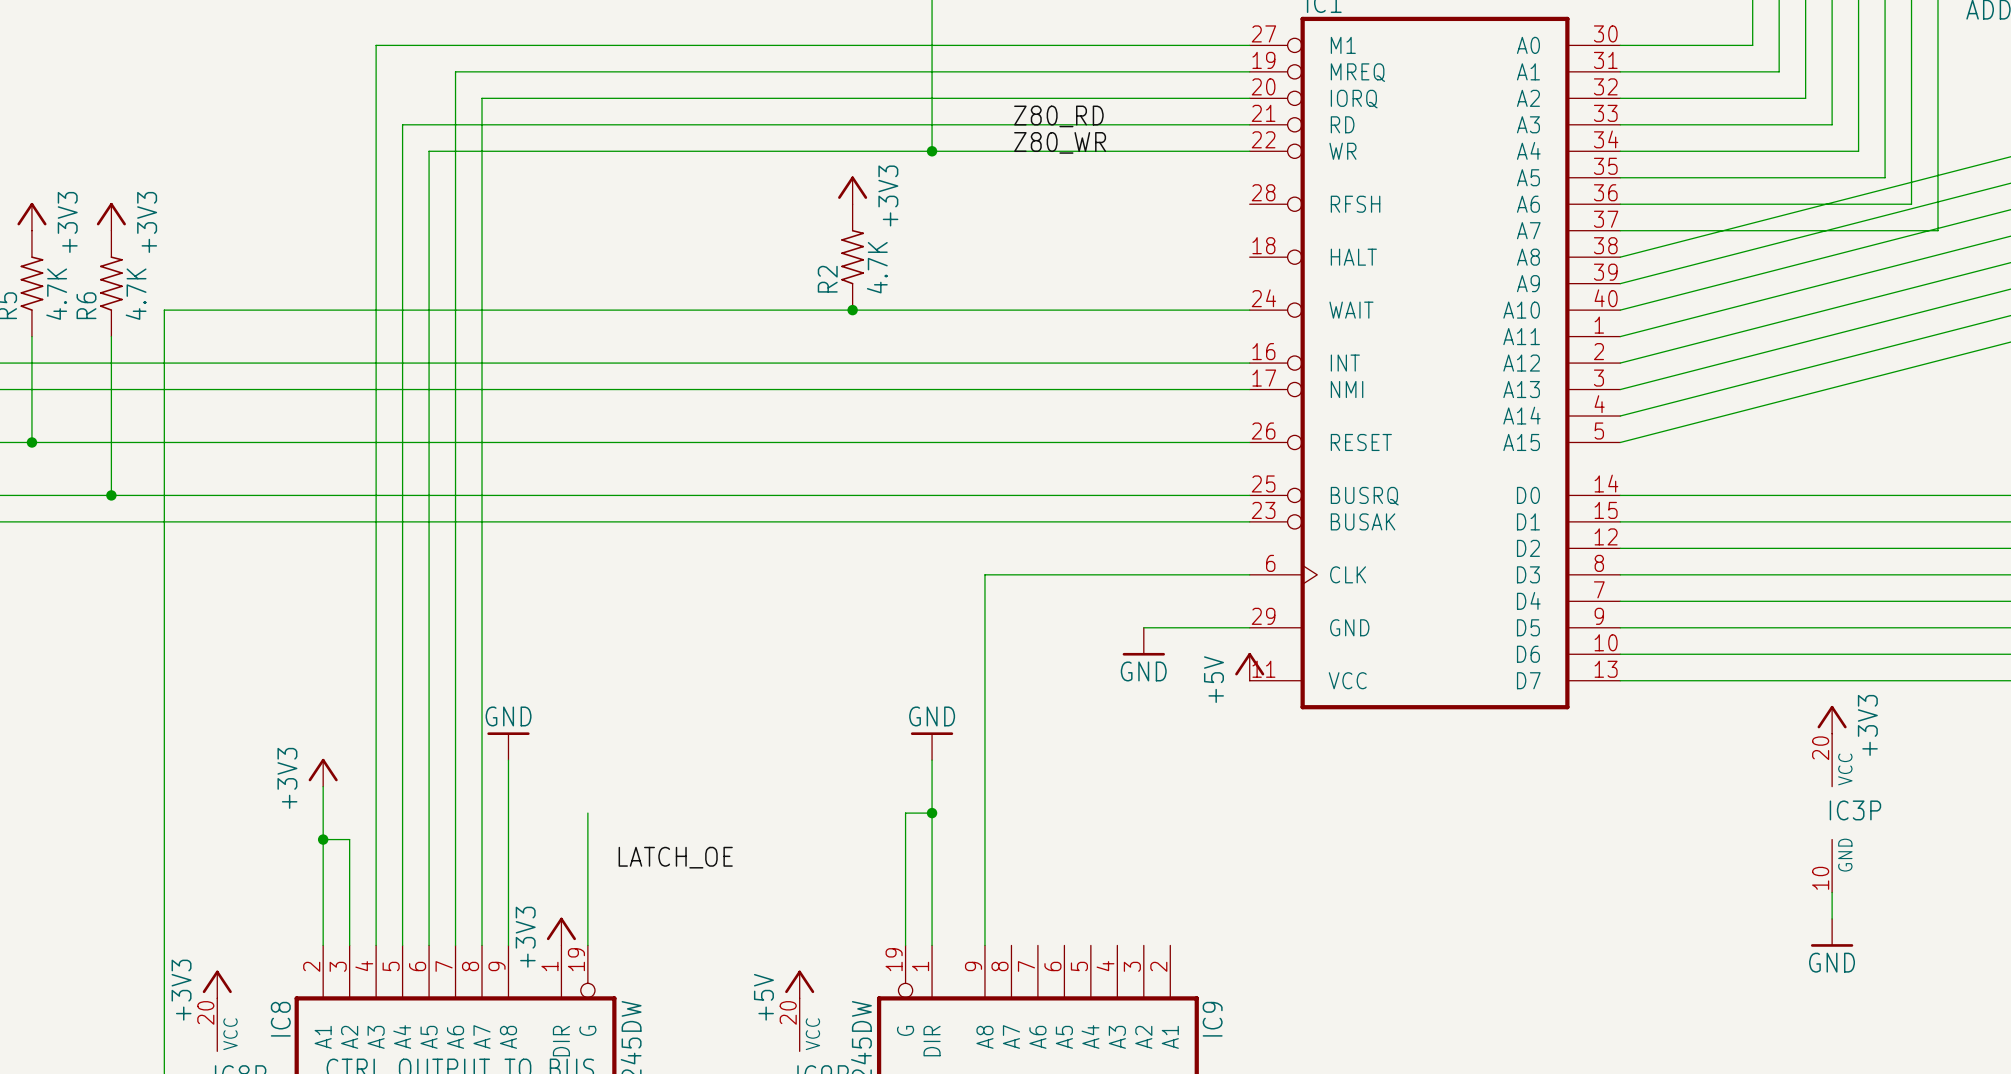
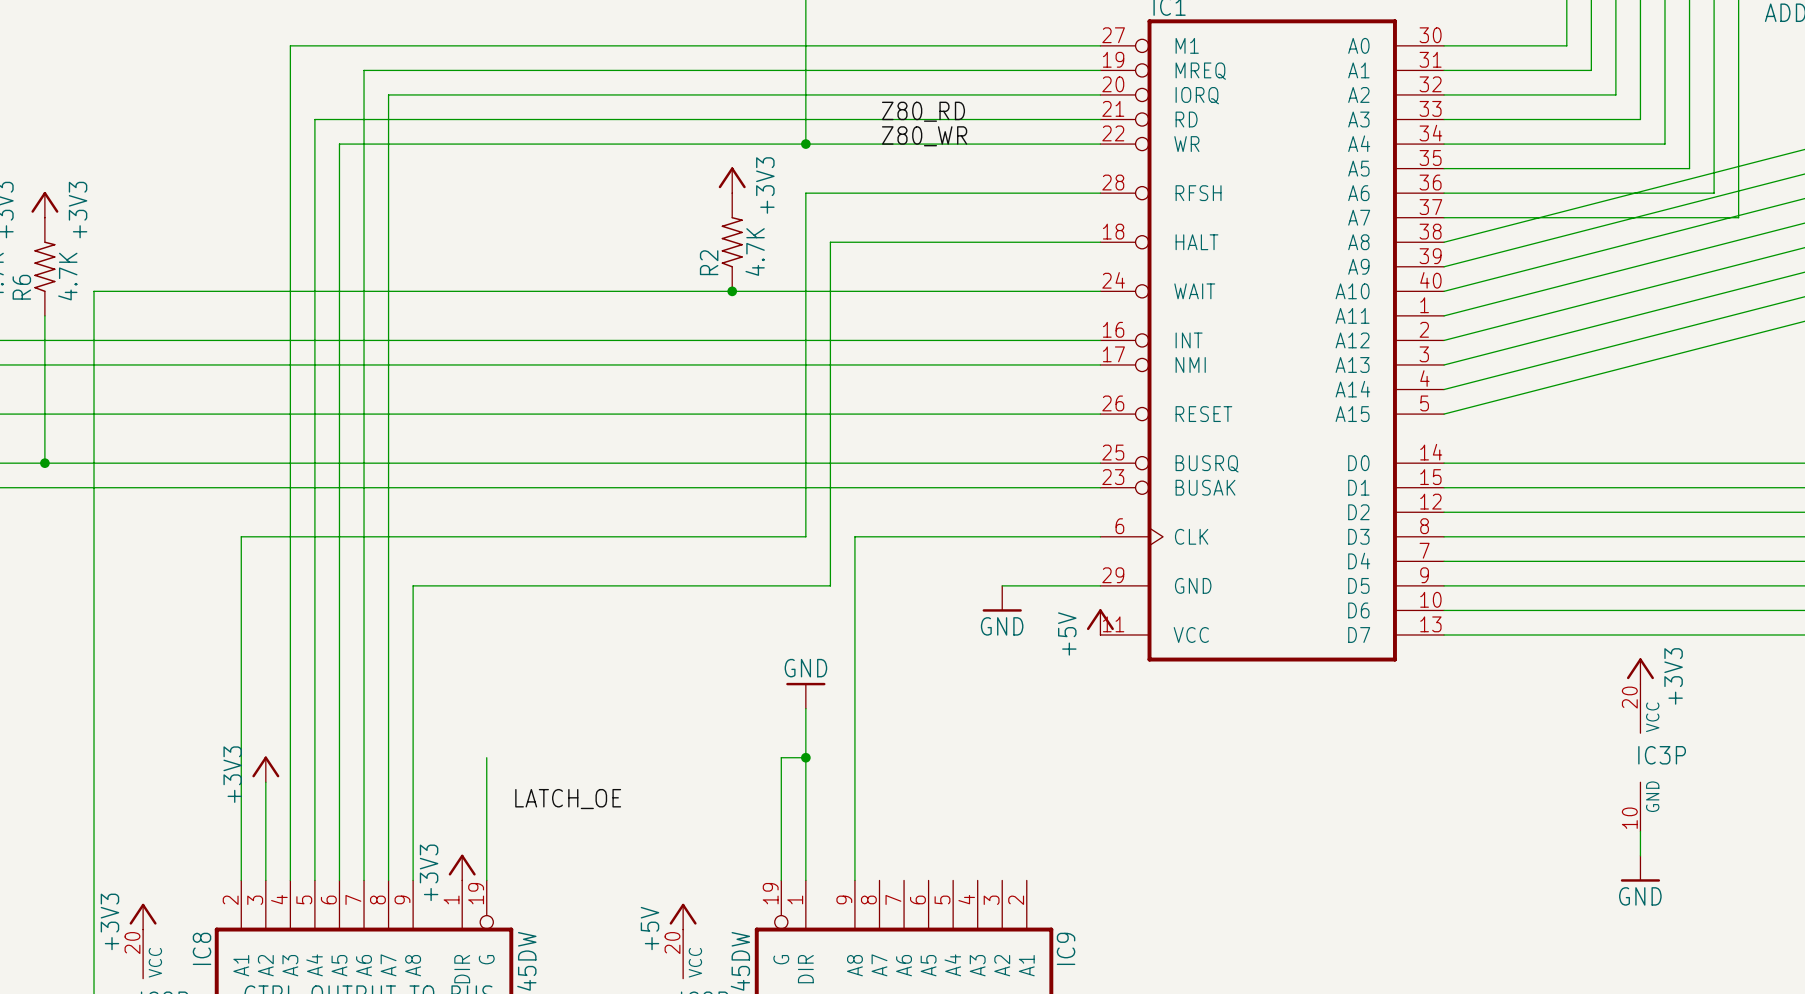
wire: none -> (1100, 193) (805, 193) (805, 536) (241, 536) (241, 733)
wire: none -> (1100, 242) (830, 242) (830, 585) (413, 585) (413, 708)
power symbol: GND (508, 746) -> none
power symbol position: +3V3 (323, 772) -> +3V3 (265, 769)
wire: (323, 839) (349, 839) -> none
junction: (323, 839) -> none

